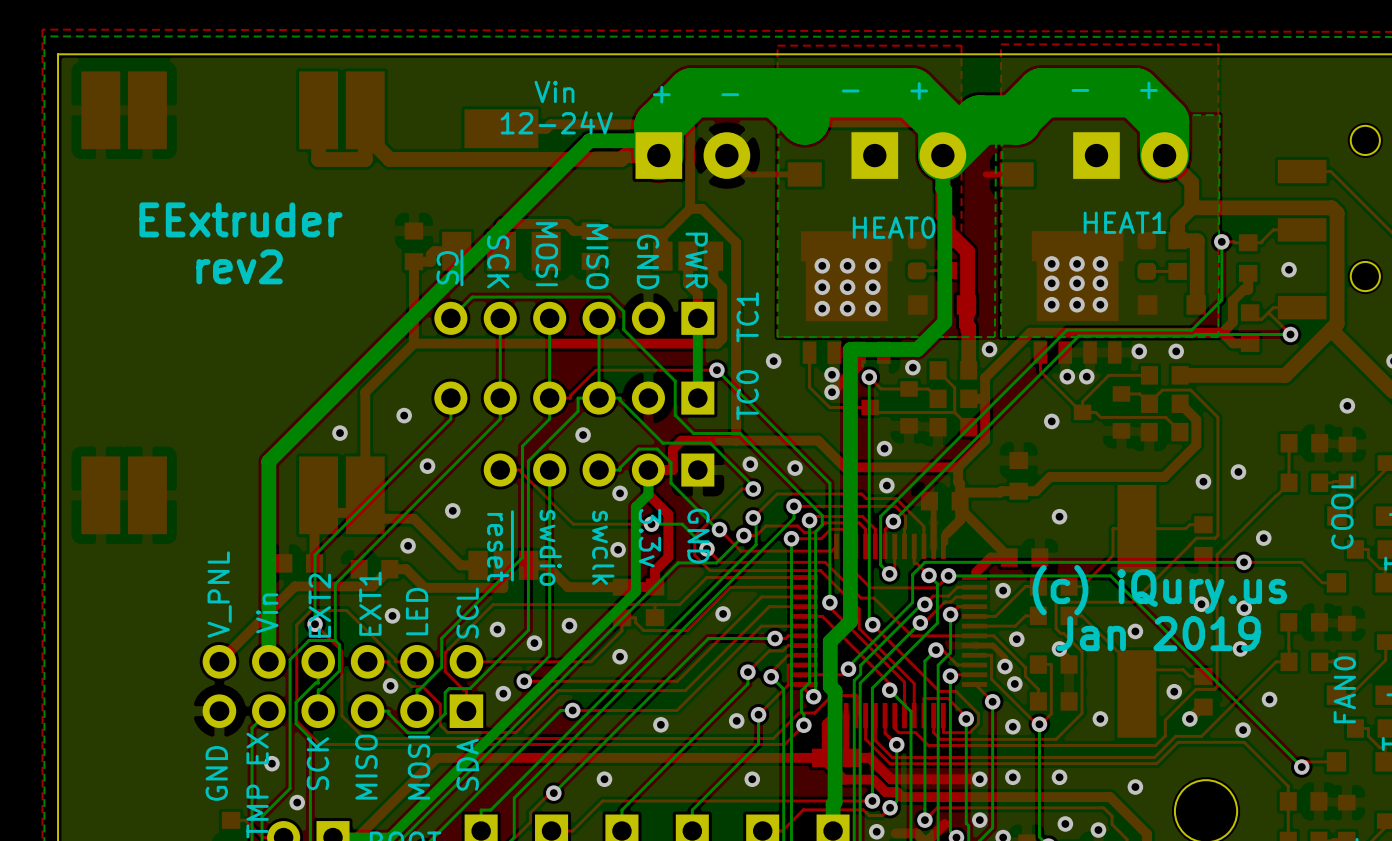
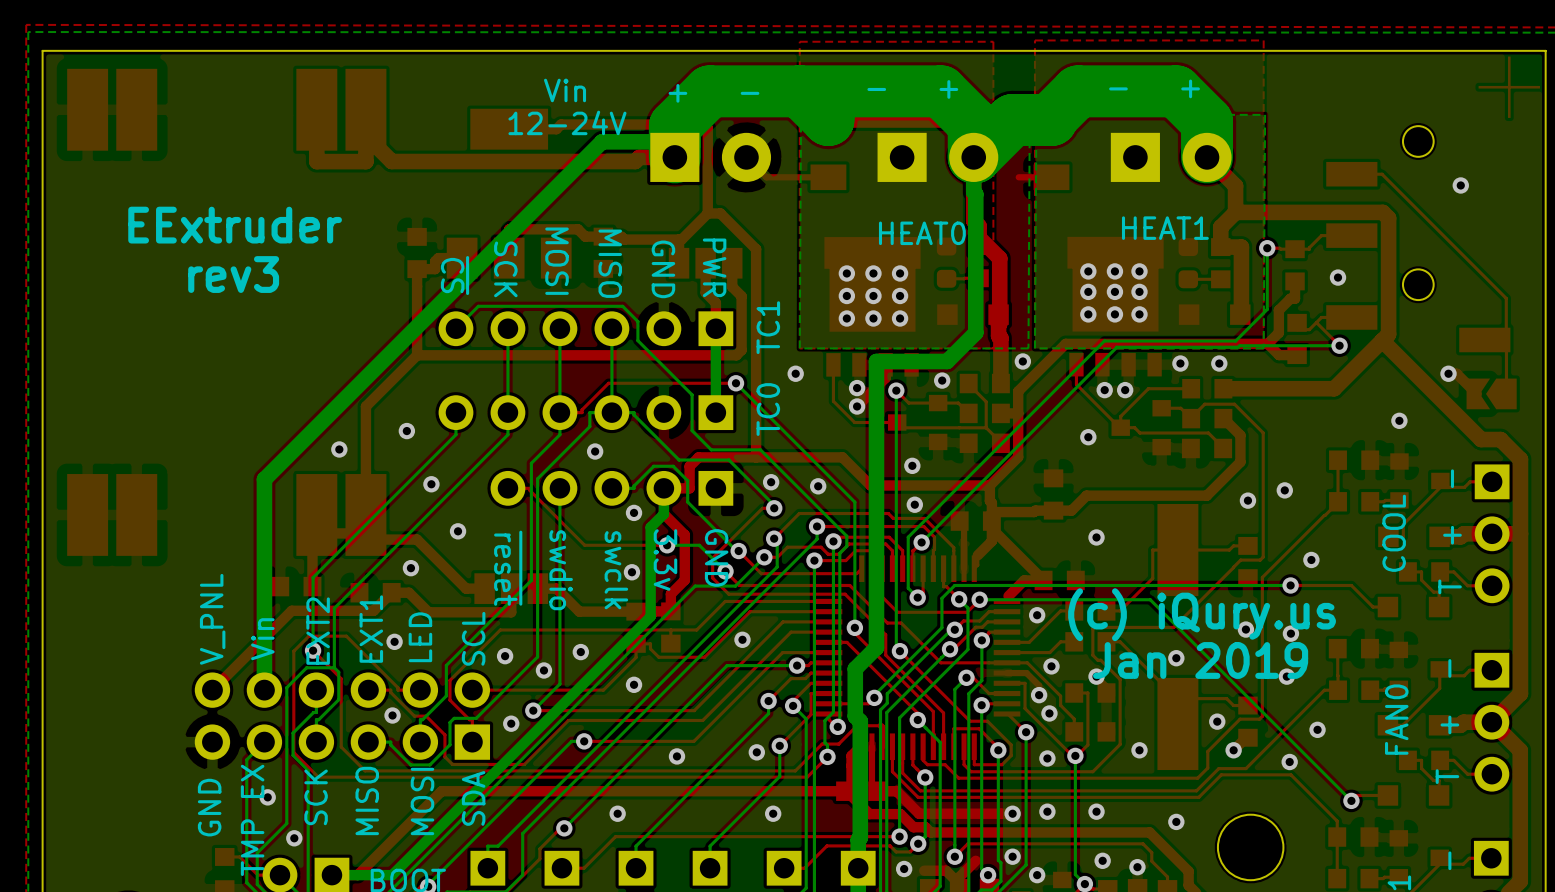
text: rev2 (239, 266) -> rev3 (233, 274)

